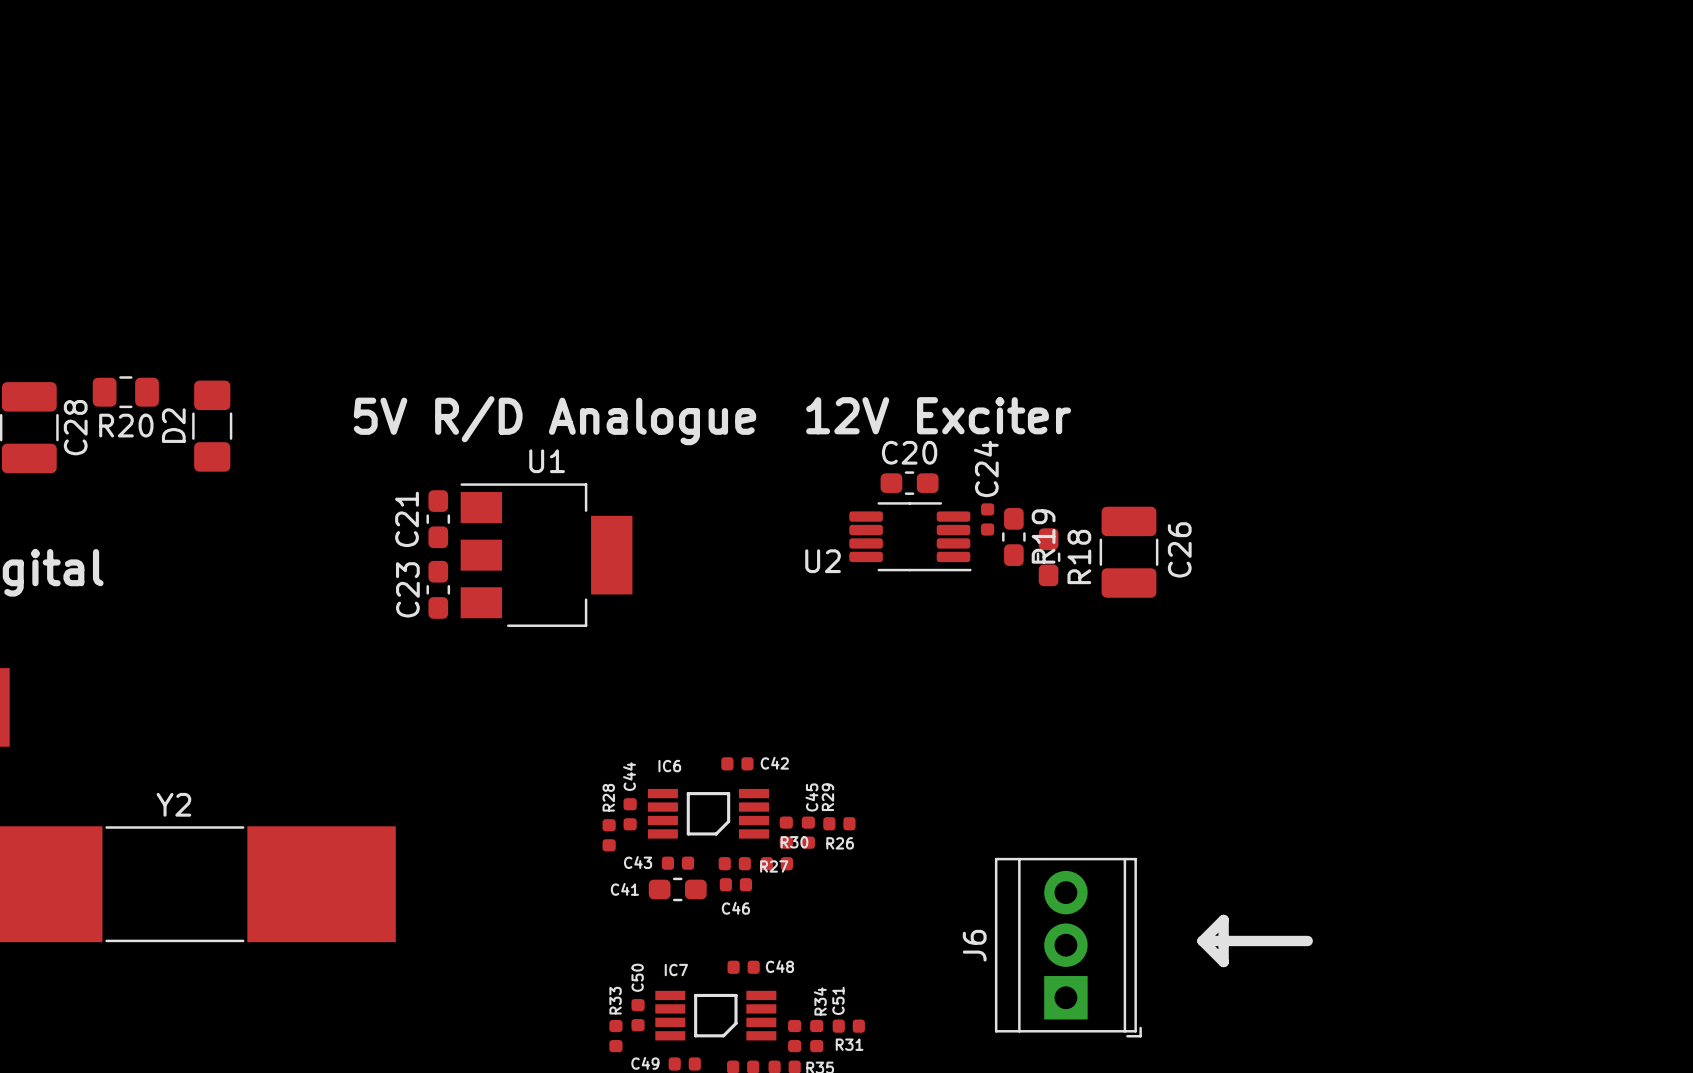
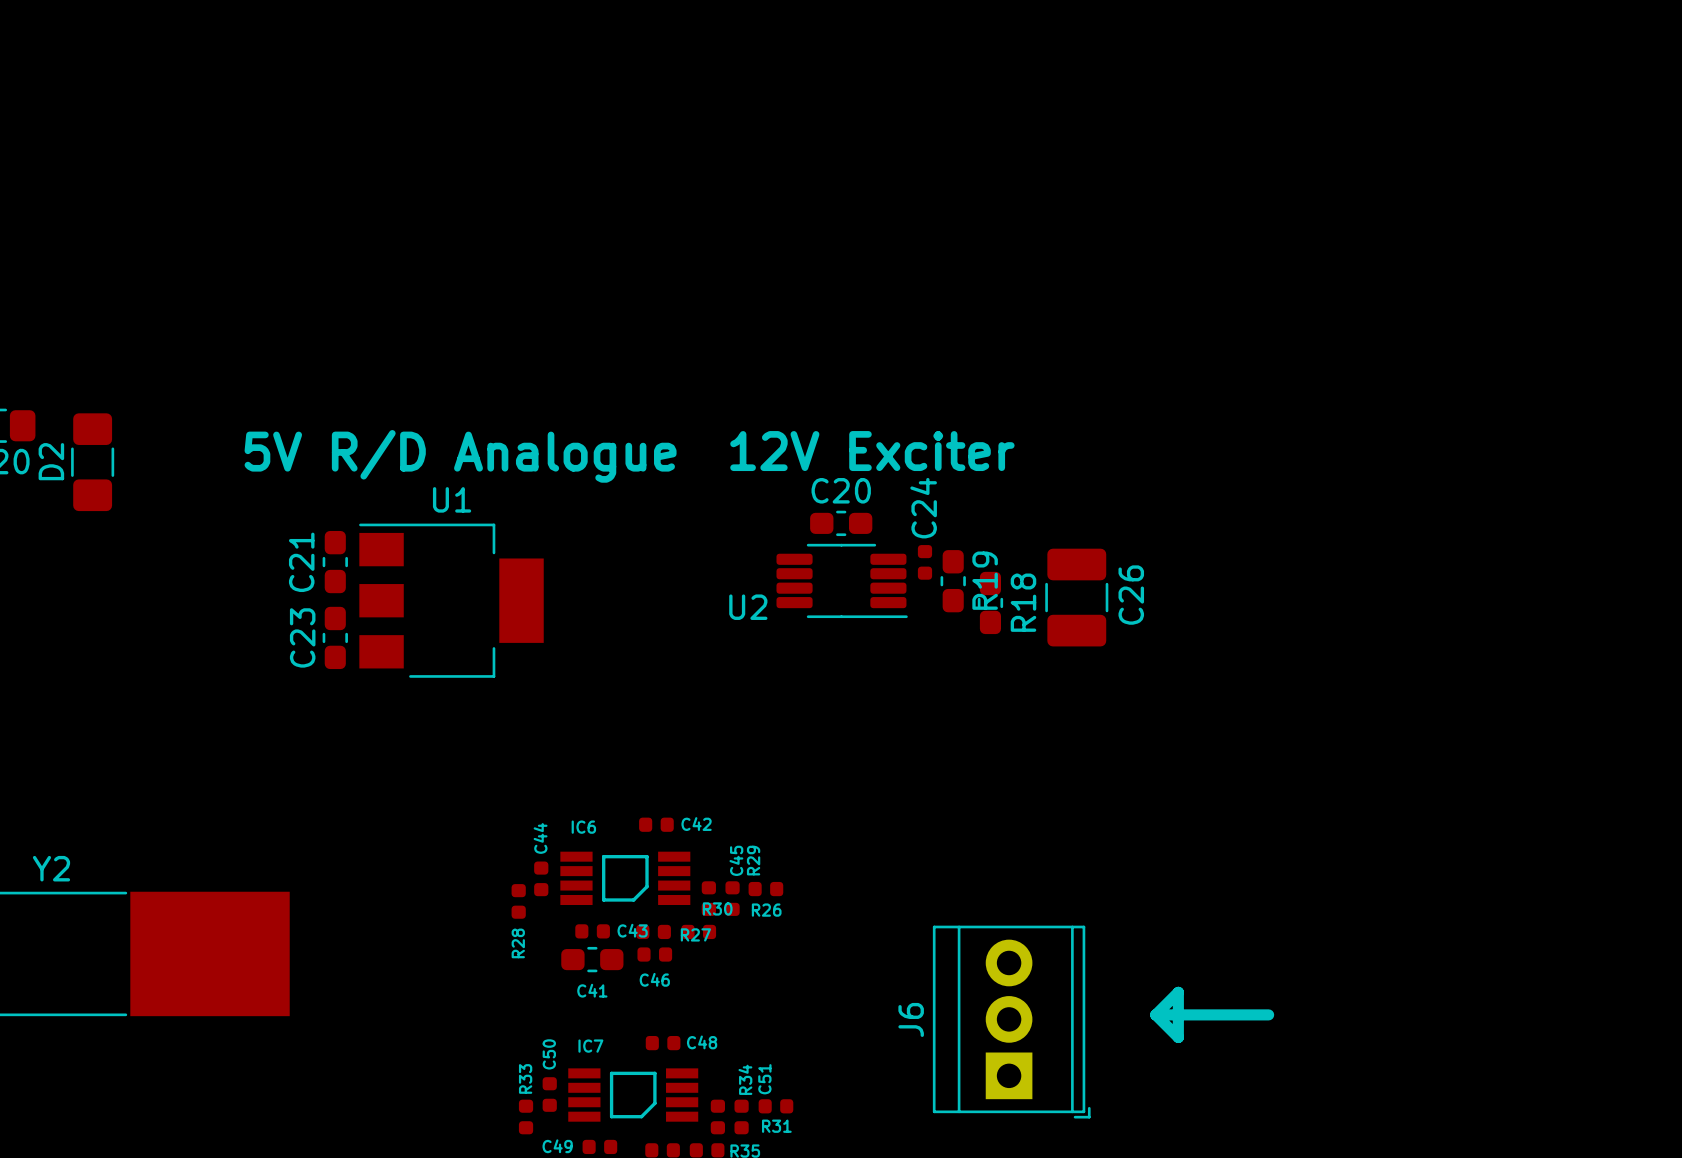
R28 name position: R28 (608, 797) -> R28 (518, 943)
C43 name position: C43 (638, 862) -> C43 (632, 930)
C41 name position: C41 (624, 889) -> C41 (592, 990)

